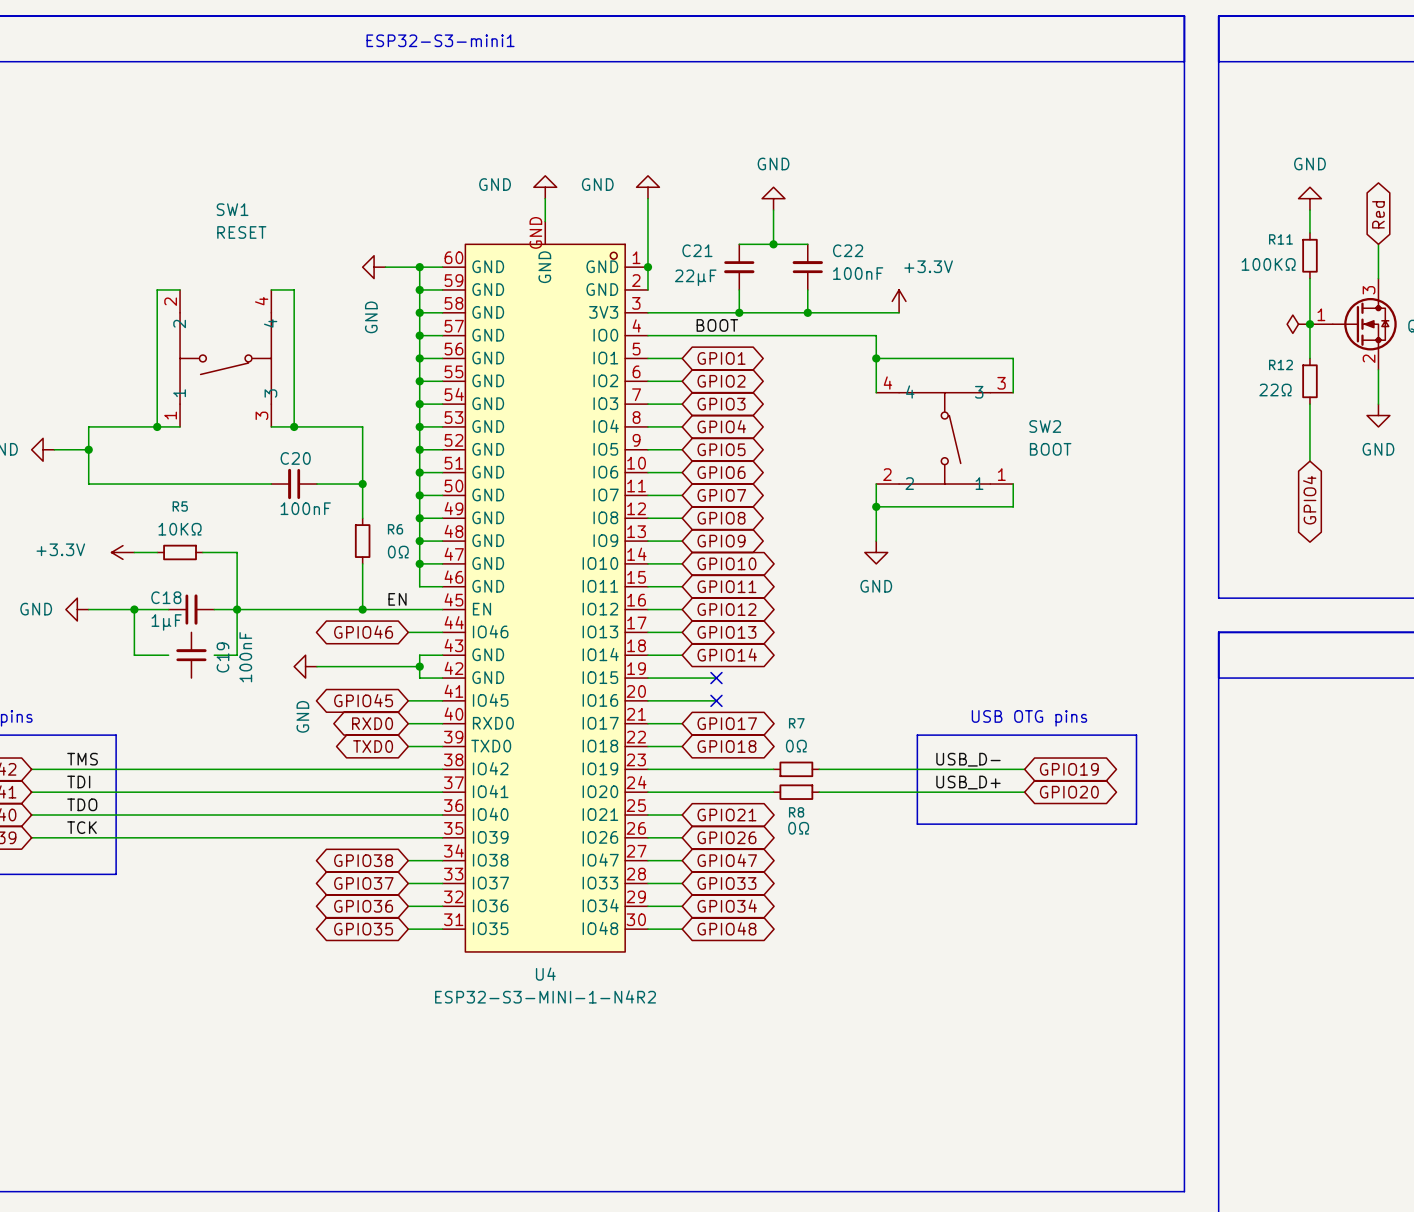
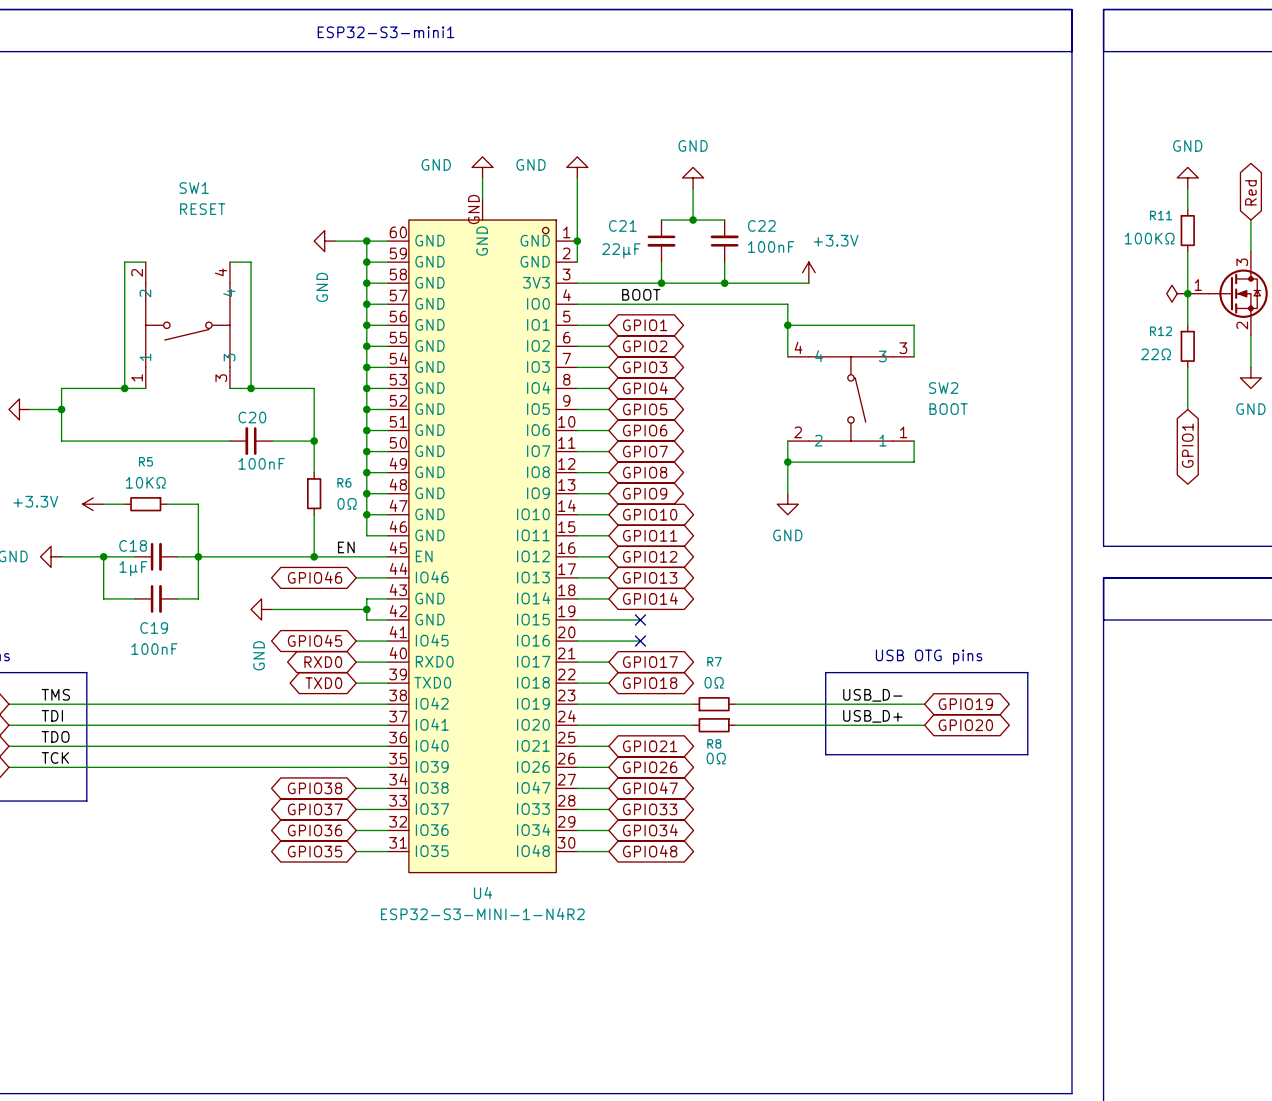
wire: (1309, 449) (1309, 461) -> none
global label: GPIO4 (1309, 500) -> GPIO1 (1187, 445)
C19 rotation: 0° (191, 655) -> 90° clockwise (156, 598)

